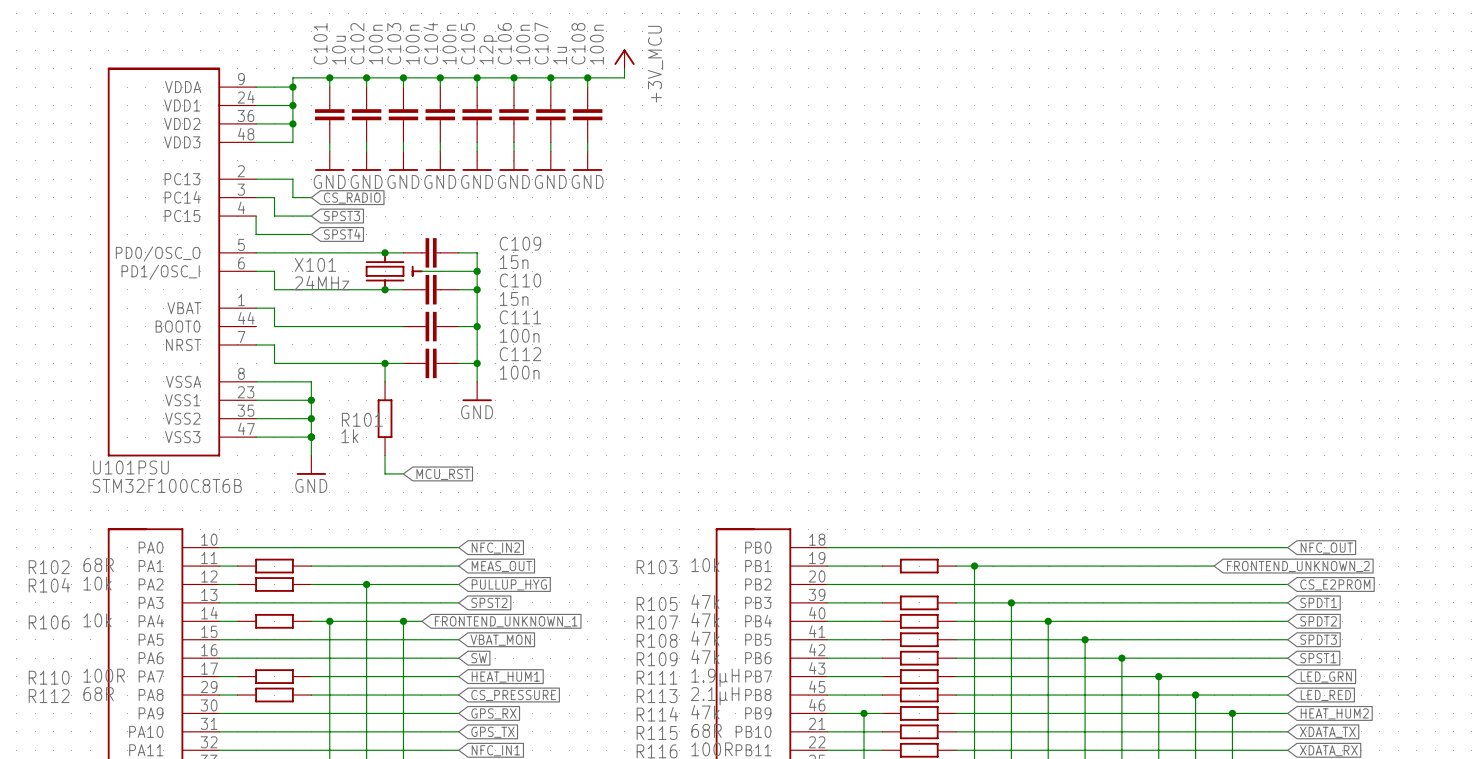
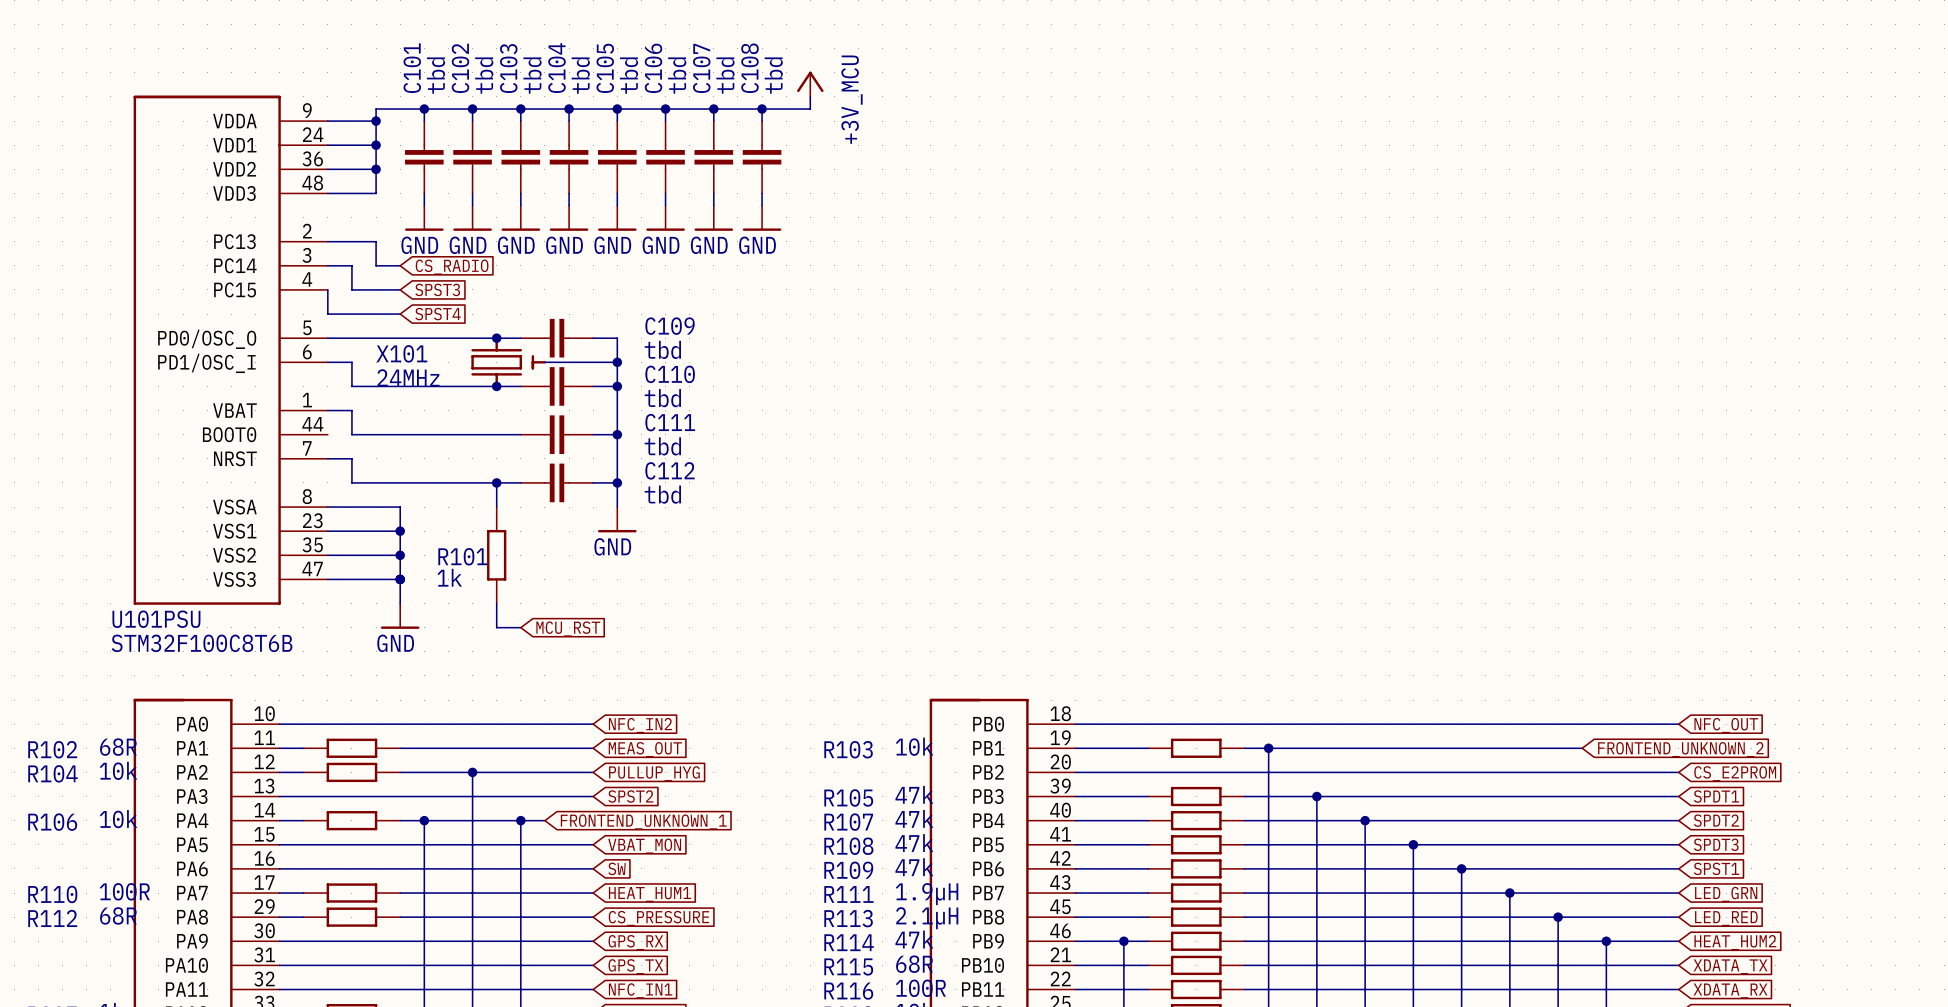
C102 value: 100n (375, 44) -> tbd (484, 75)
C103 value: 100n (412, 44) -> tbd (532, 75)
C104 value: 100n (449, 44) -> tbd (580, 75)
C106 value: 100n (523, 44) -> tbd (677, 75)
C108 value: 100n (596, 44) -> tbd (773, 75)
C105 value: 12p (488, 49) -> tbd (629, 75)
C101 value: 10u (338, 50) -> tbd (436, 75)
C107 value: 1u (560, 55) -> tbd (725, 75)
C109 value: 15n (514, 262) -> tbd (662, 349)
C110 value: 15n (514, 298) -> tbd (662, 398)
C111 value: 100n (519, 335) -> tbd (662, 446)
C112 value: 100n (519, 372) -> tbd (662, 494)

